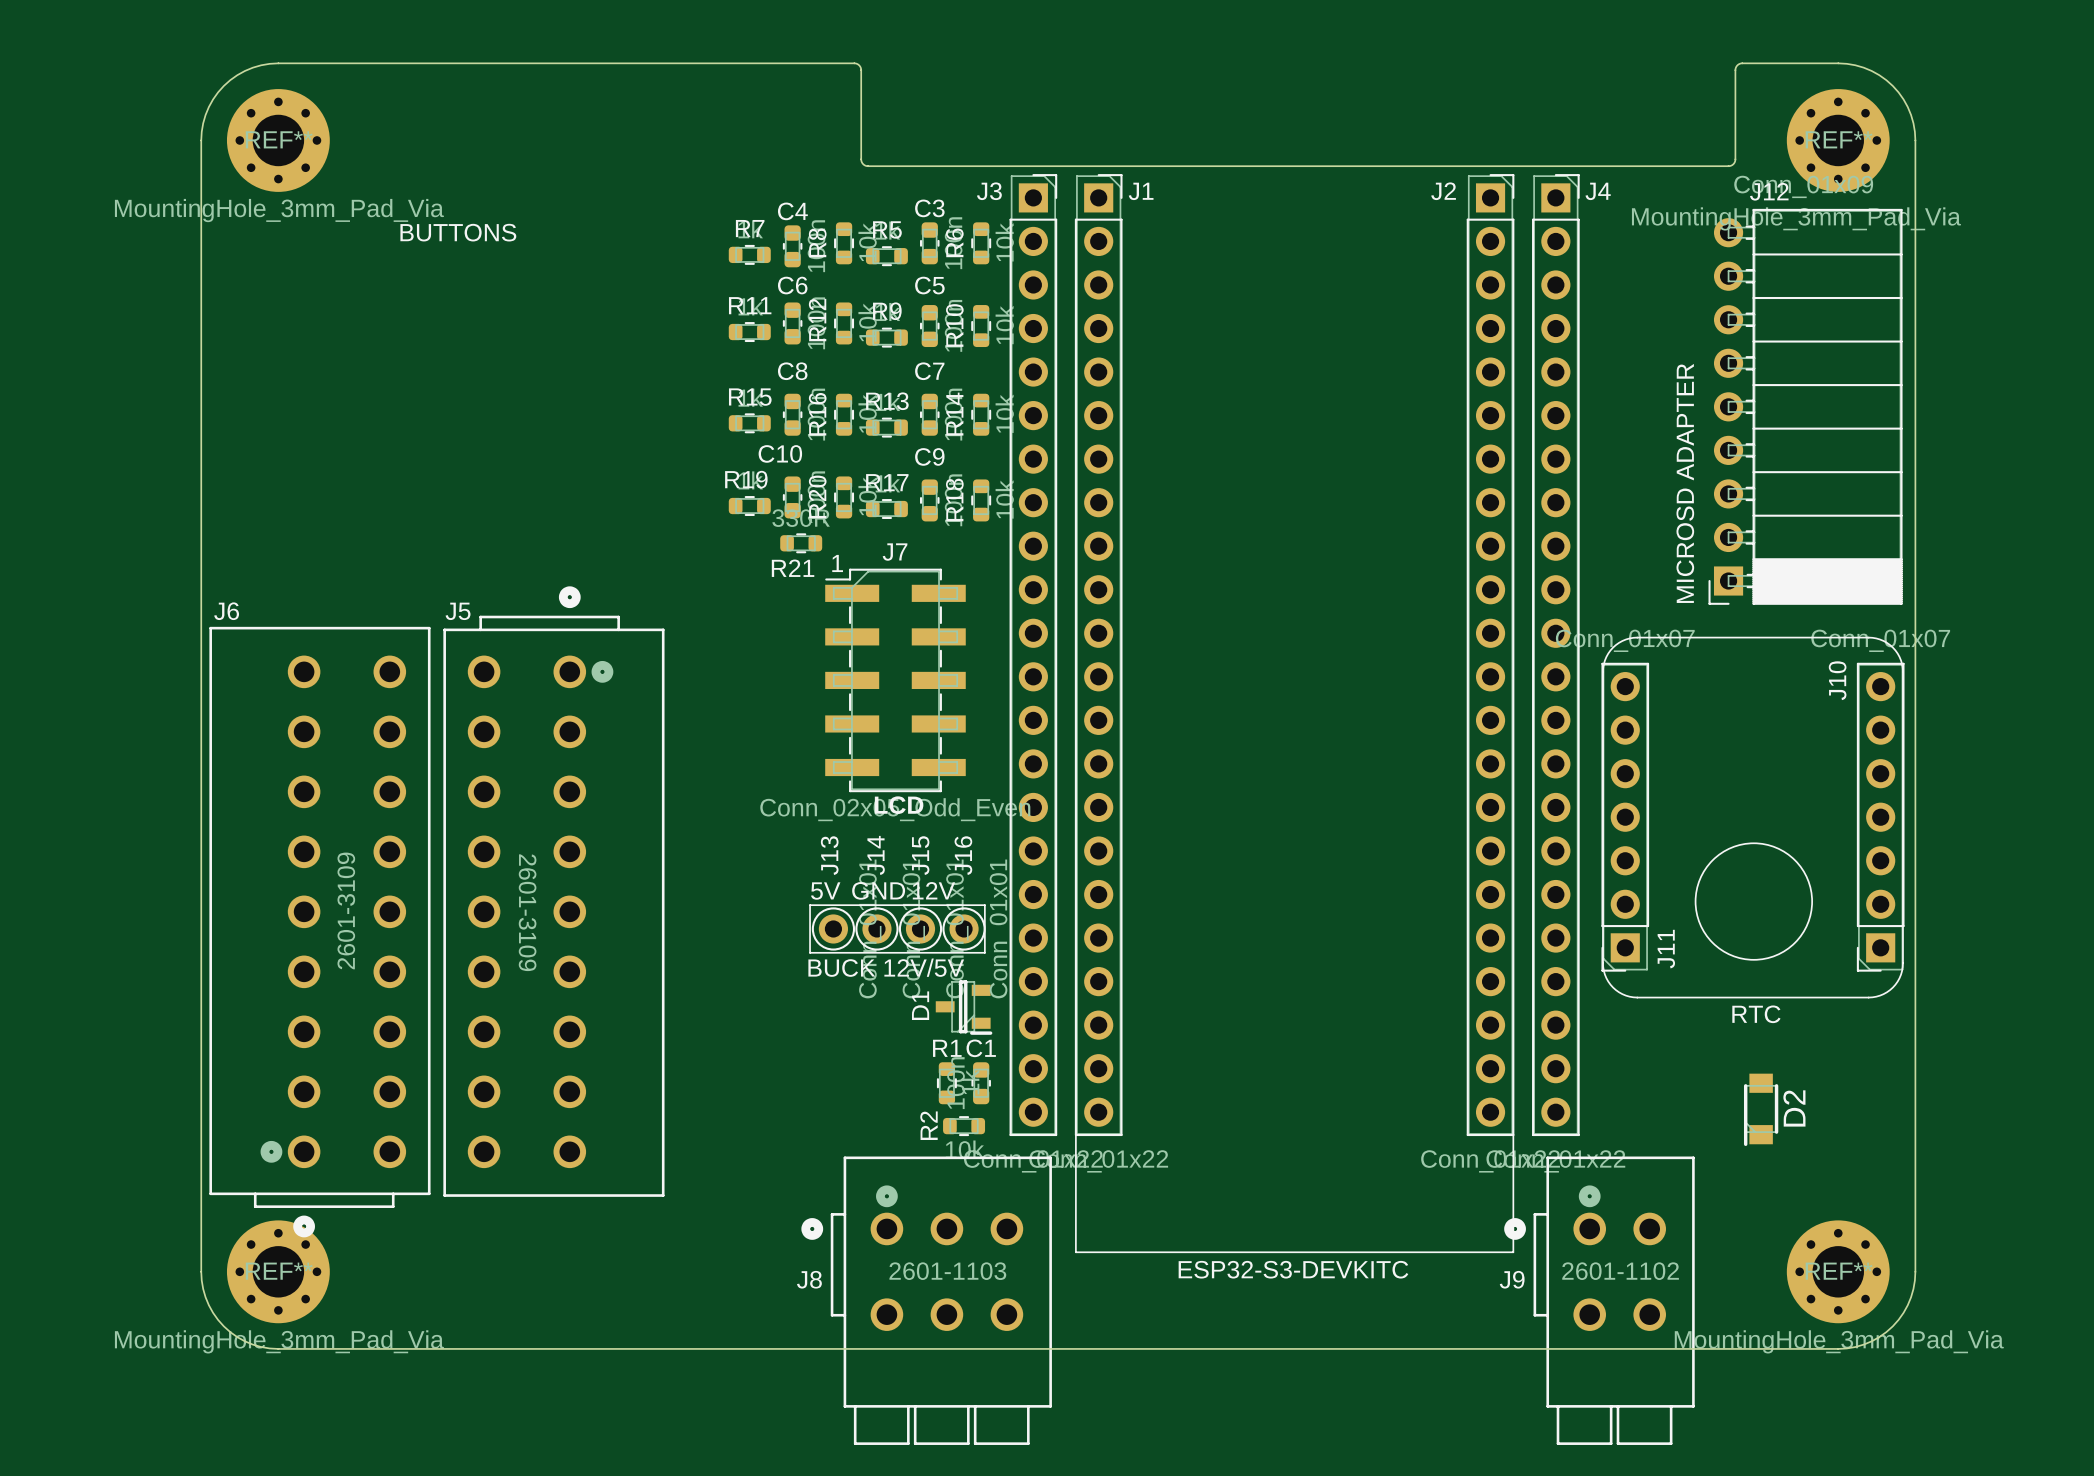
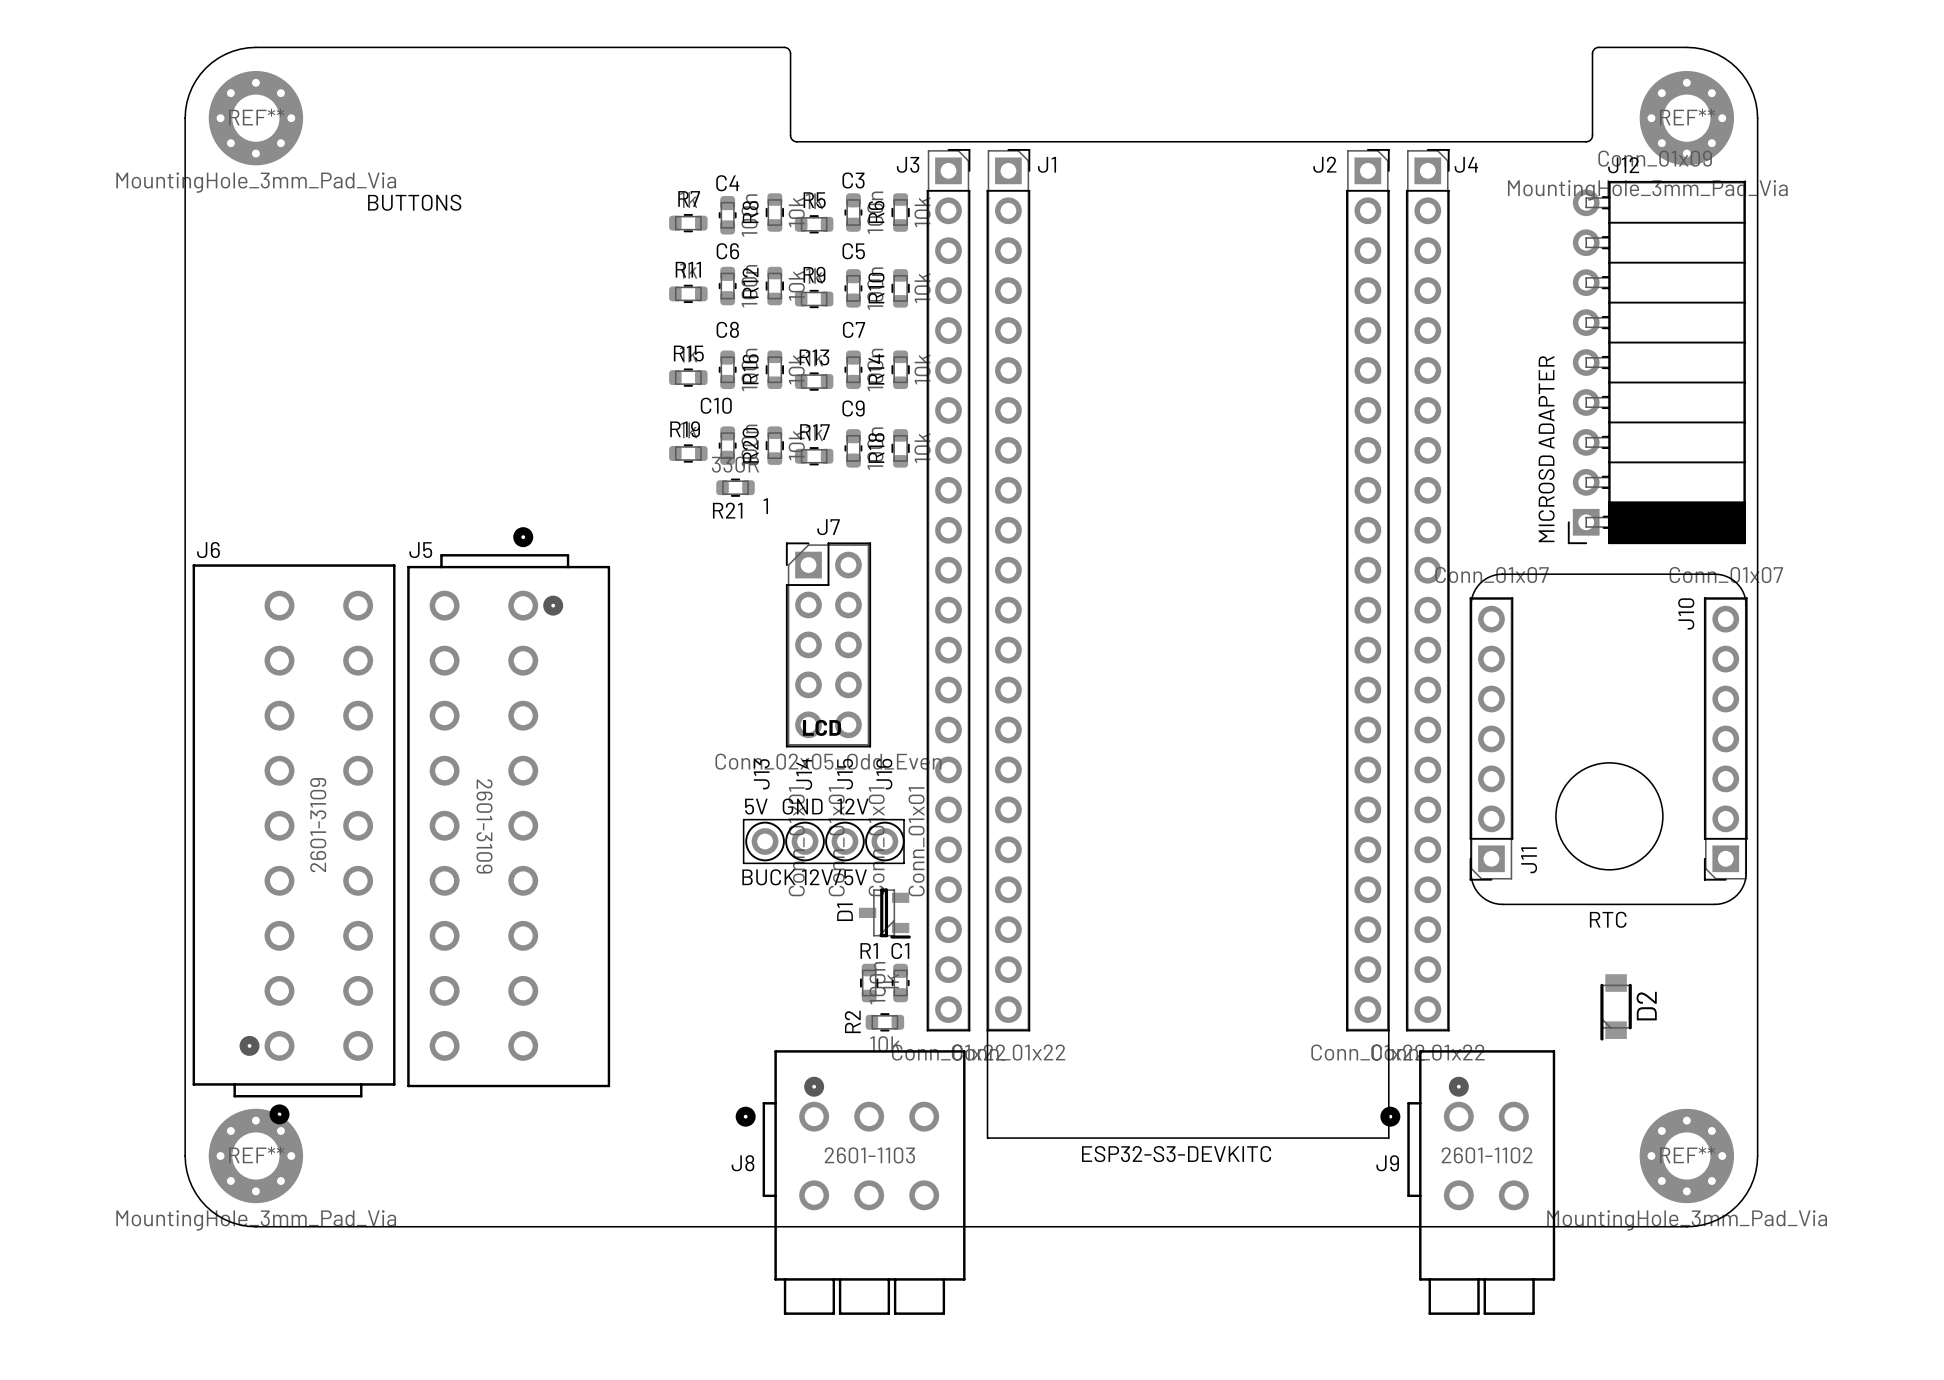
J7 footprint: [825, 568, 966, 793] -> [785, 542, 872, 748]

